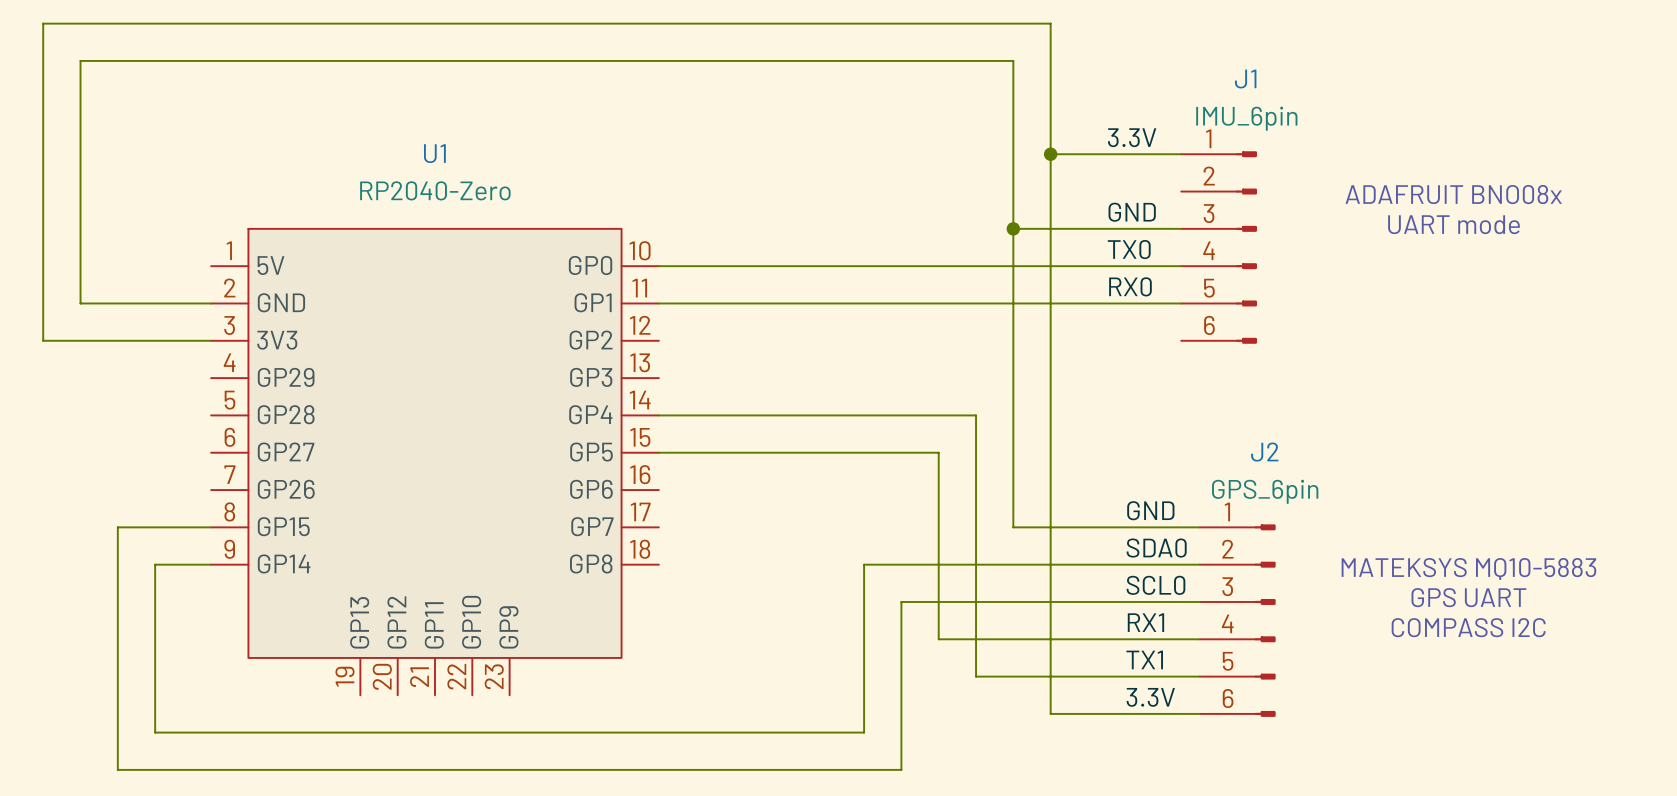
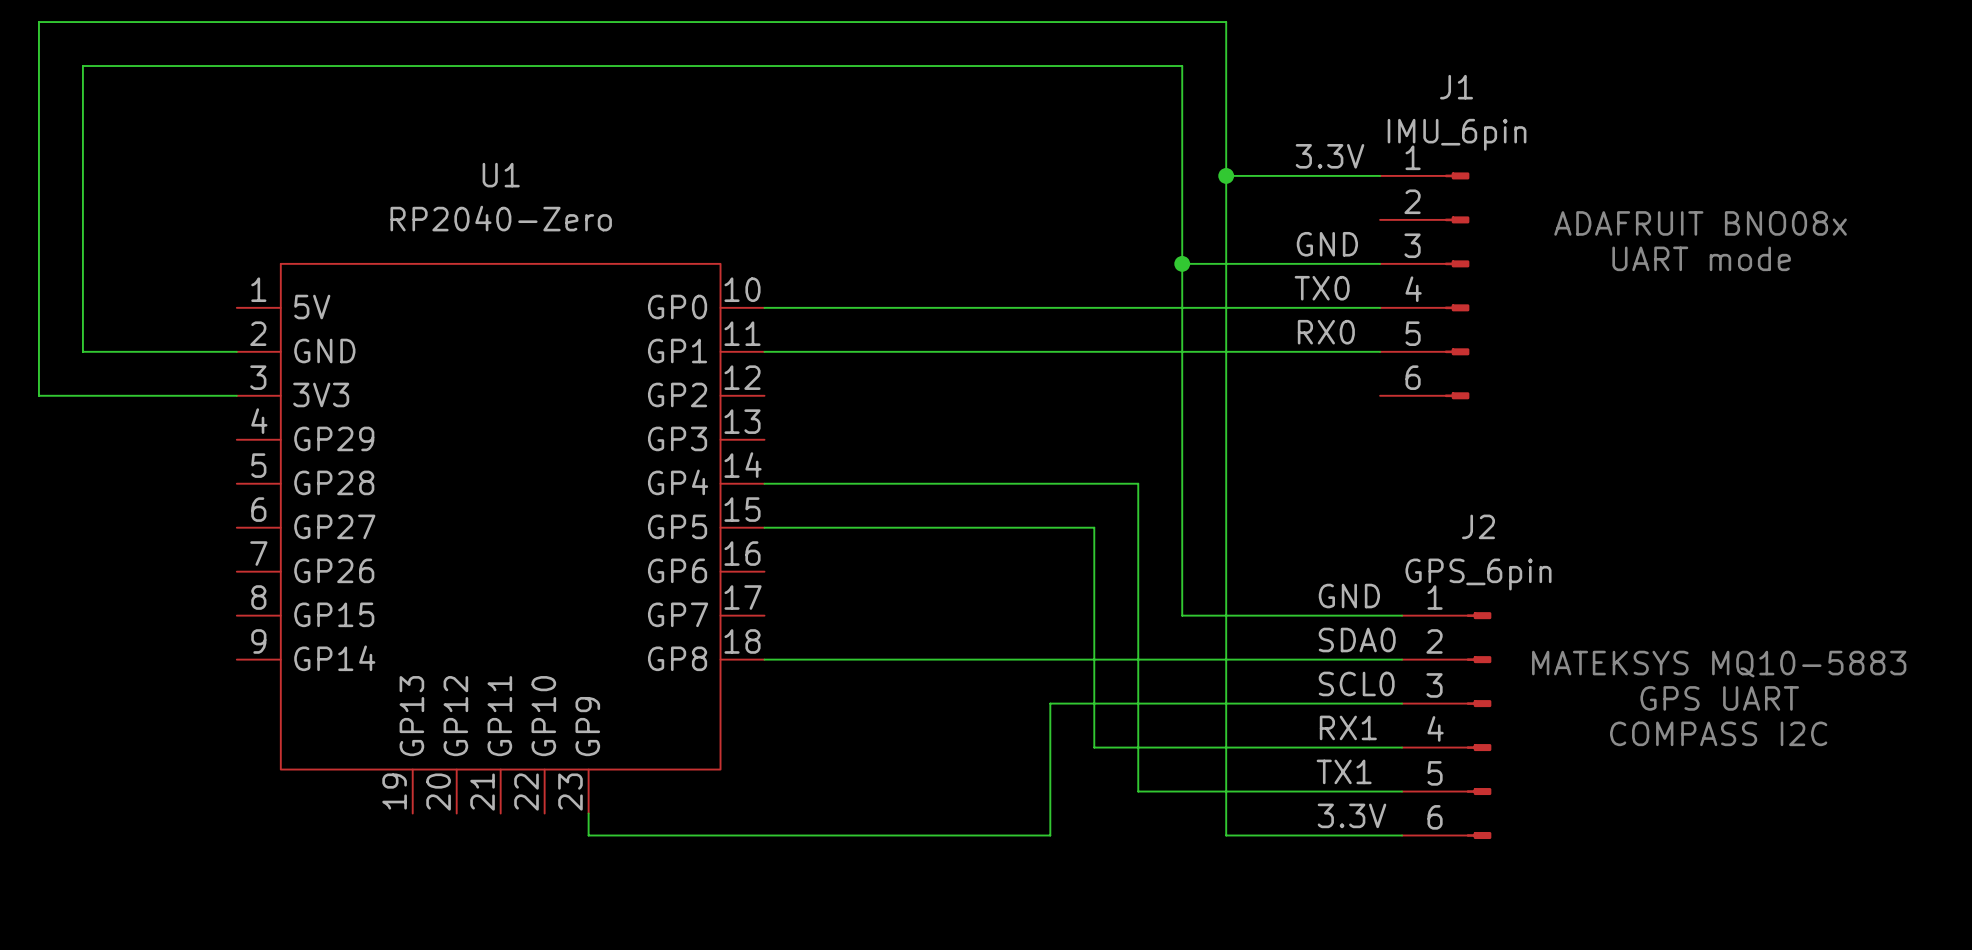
wire: (211, 527) (117, 527) (117, 769) (901, 769) (901, 713) -> (588, 813) (588, 835) (1050, 835)
wire: (211, 564) (155, 564) (155, 732) (864, 732) (864, 564) -> (764, 659) (1006, 659)

